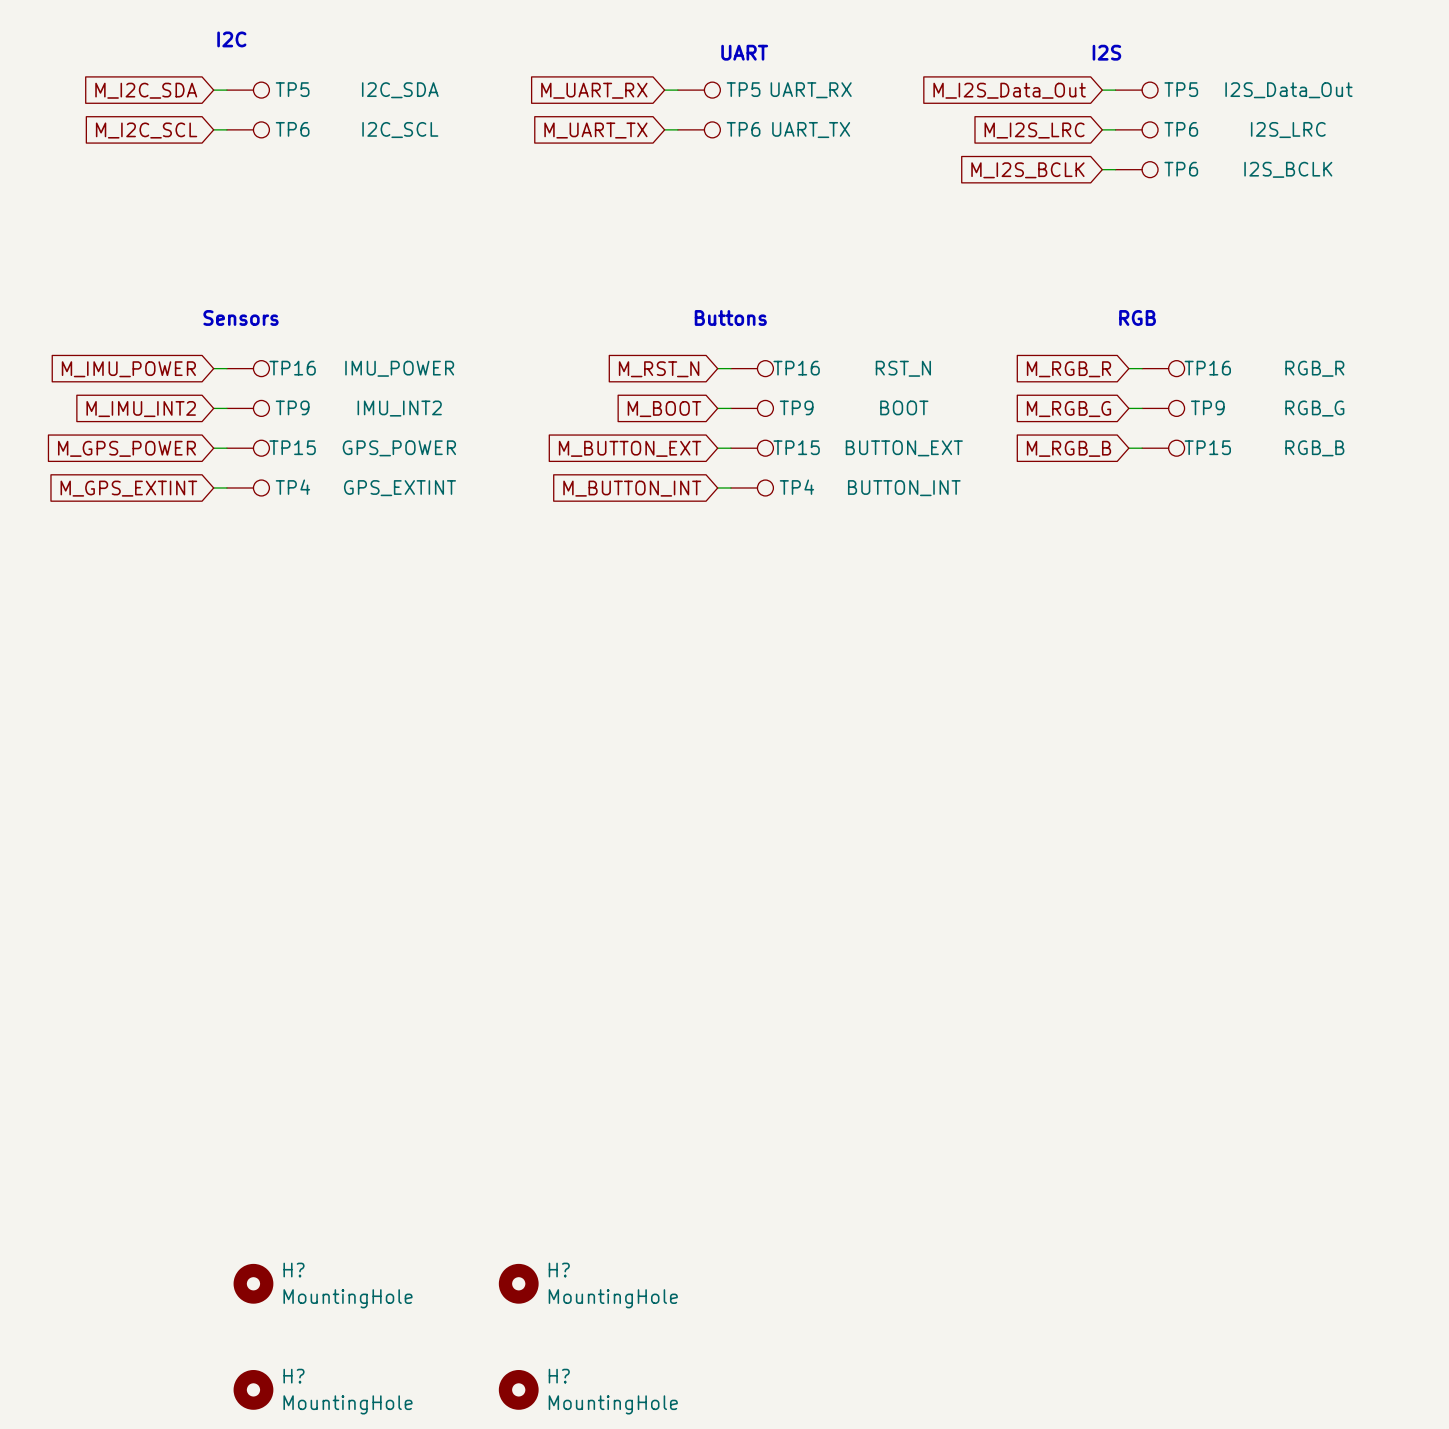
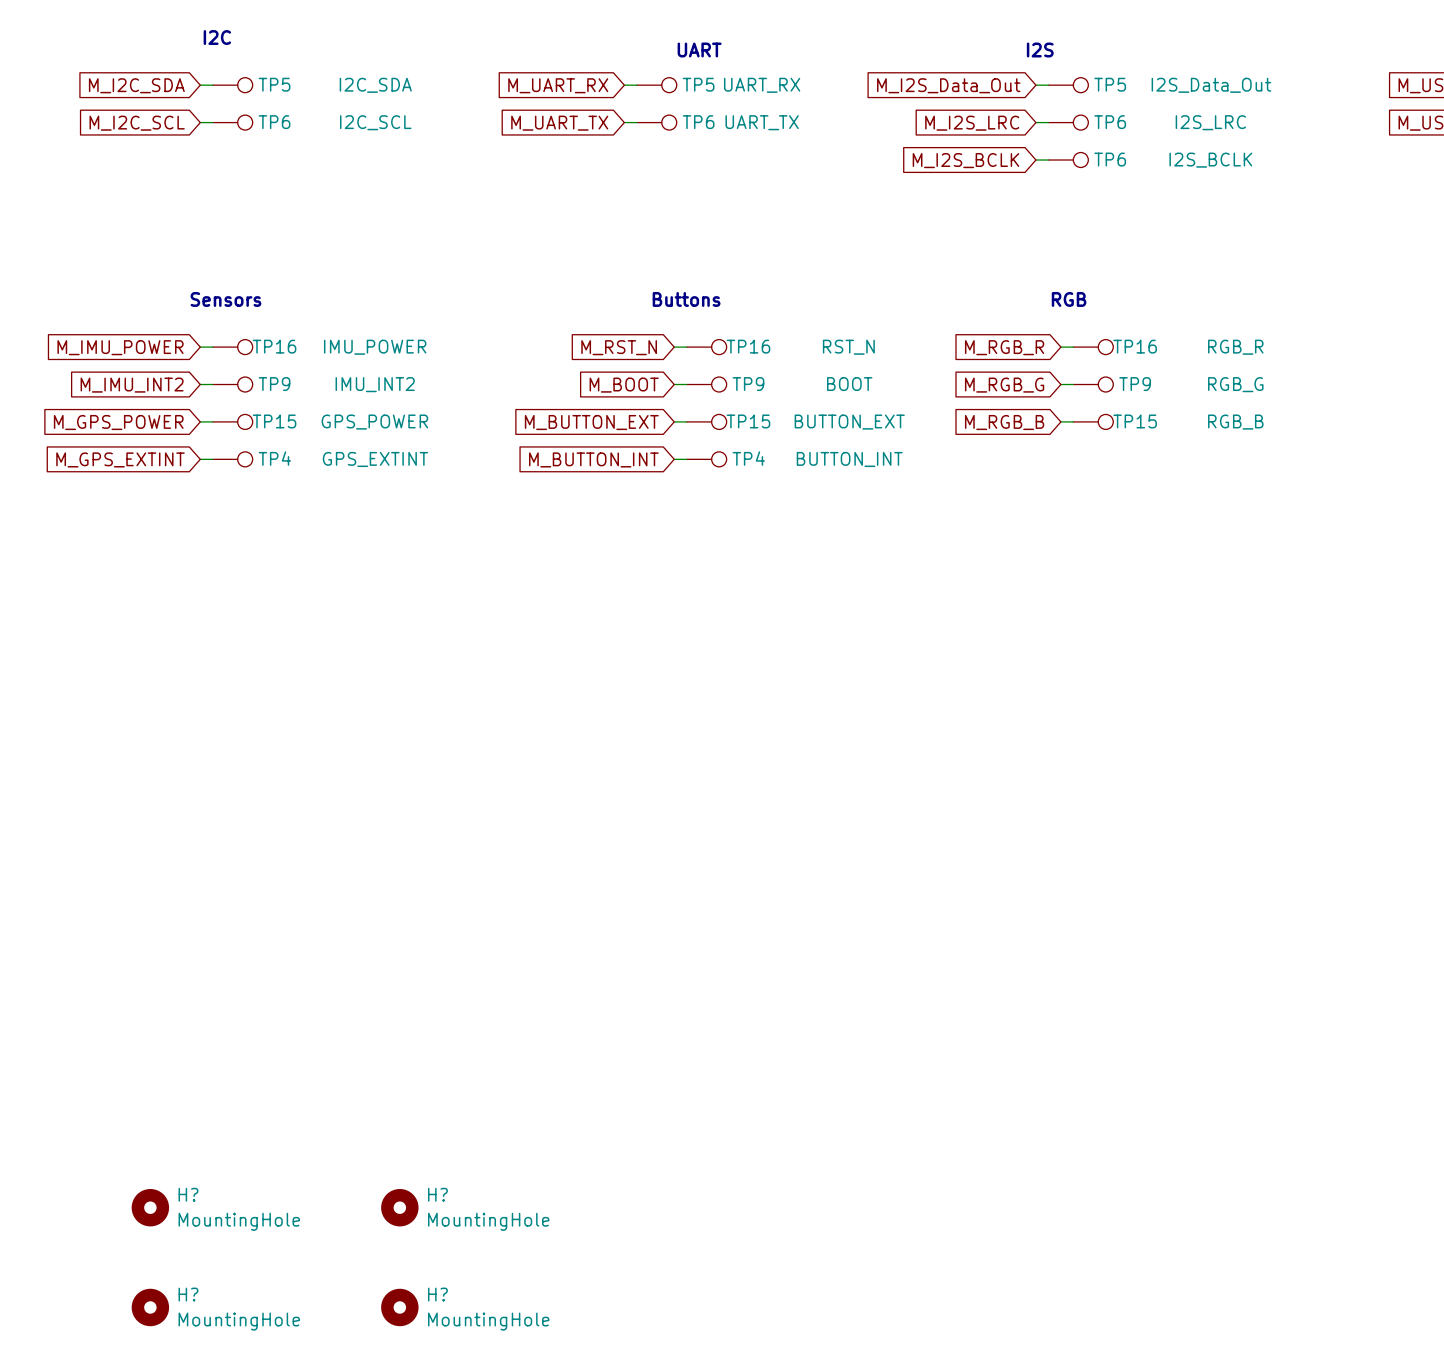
H?: none -> MountingHole (150, 1207)
H?: MountingHole (253, 1283) -> none
H?: none -> MountingHole (399, 1207)
H?: MountingHole (518, 1283) -> none
H?: none -> MountingHole (150, 1307)
H?: MountingHole (253, 1389) -> none
H?: none -> MountingHole (399, 1307)
H?: MountingHole (518, 1389) -> none

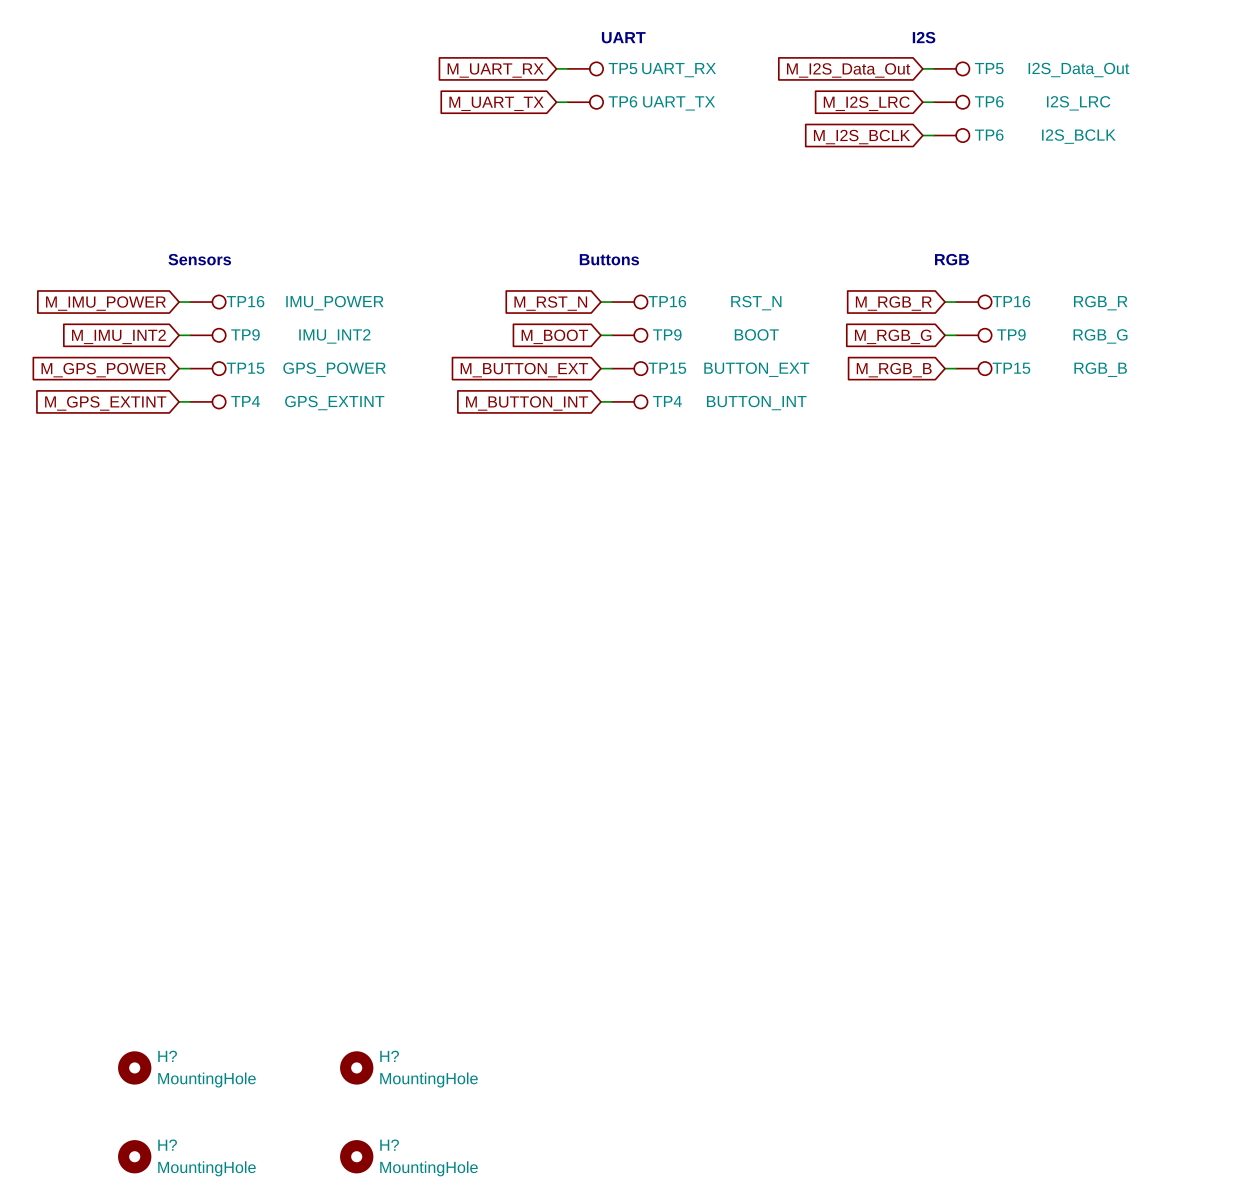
text: I2C (217, 37) -> none
global label: M_I2C_SDA (136, 85) -> none
wire: (200, 85) (212, 85) -> none
TP5: I2C_SDA (232, 85) -> none
wire: (200, 122) (212, 122) -> none
TP6: I2C_SCL (232, 122) -> none
global label: M_I2C_SCL (137, 123) -> none

